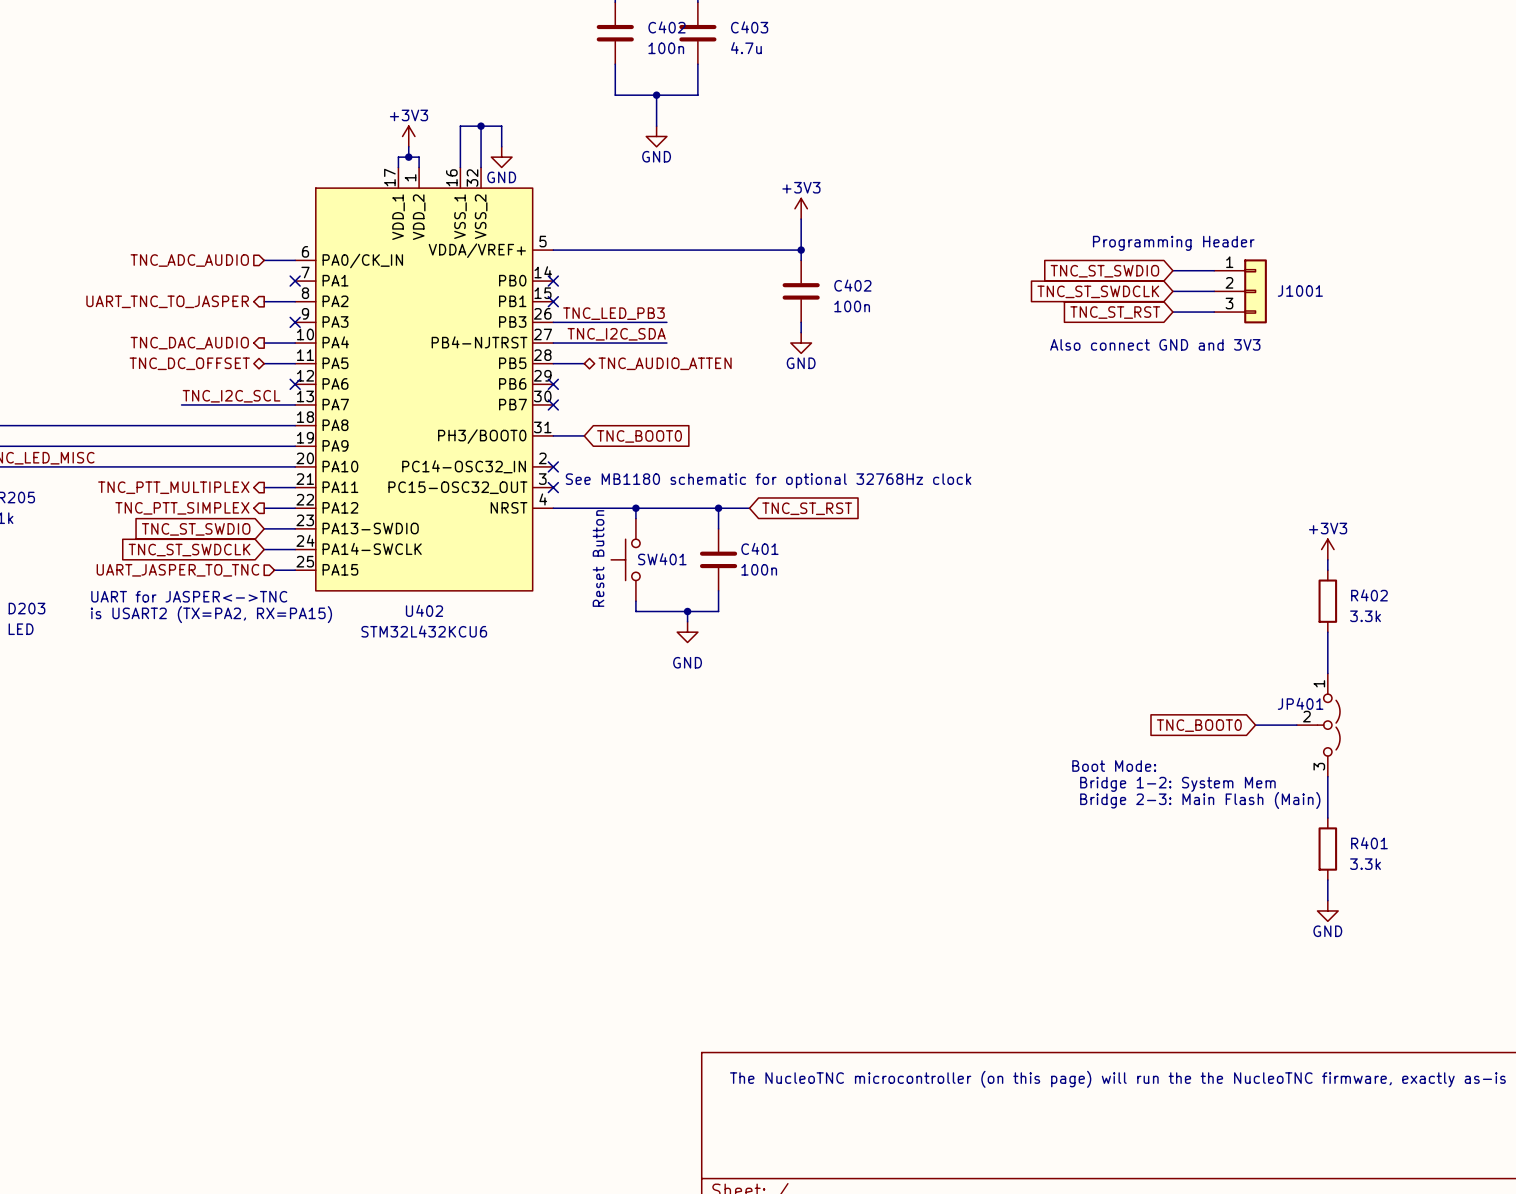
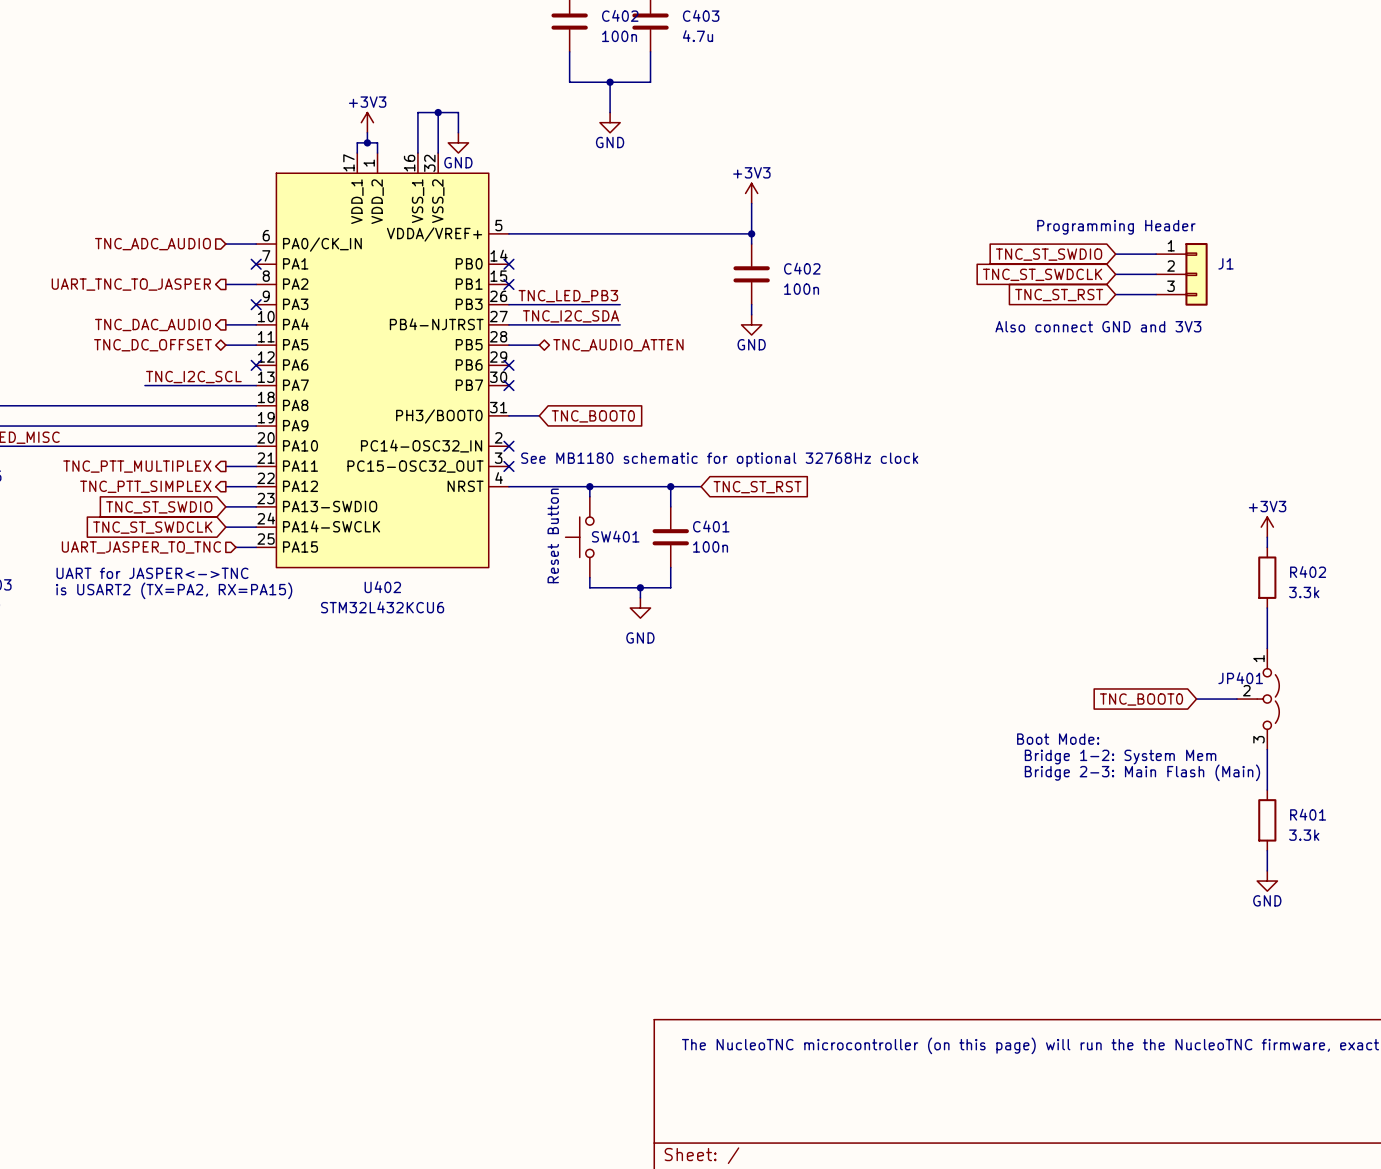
J1001 name: J1001 (1300, 290) -> J1 (1225, 263)

